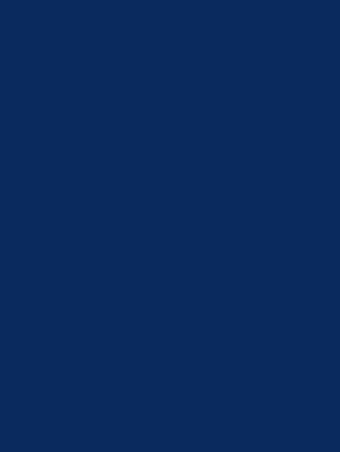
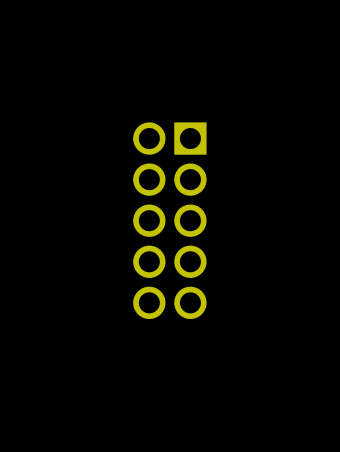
part: none -> (169, 220)

